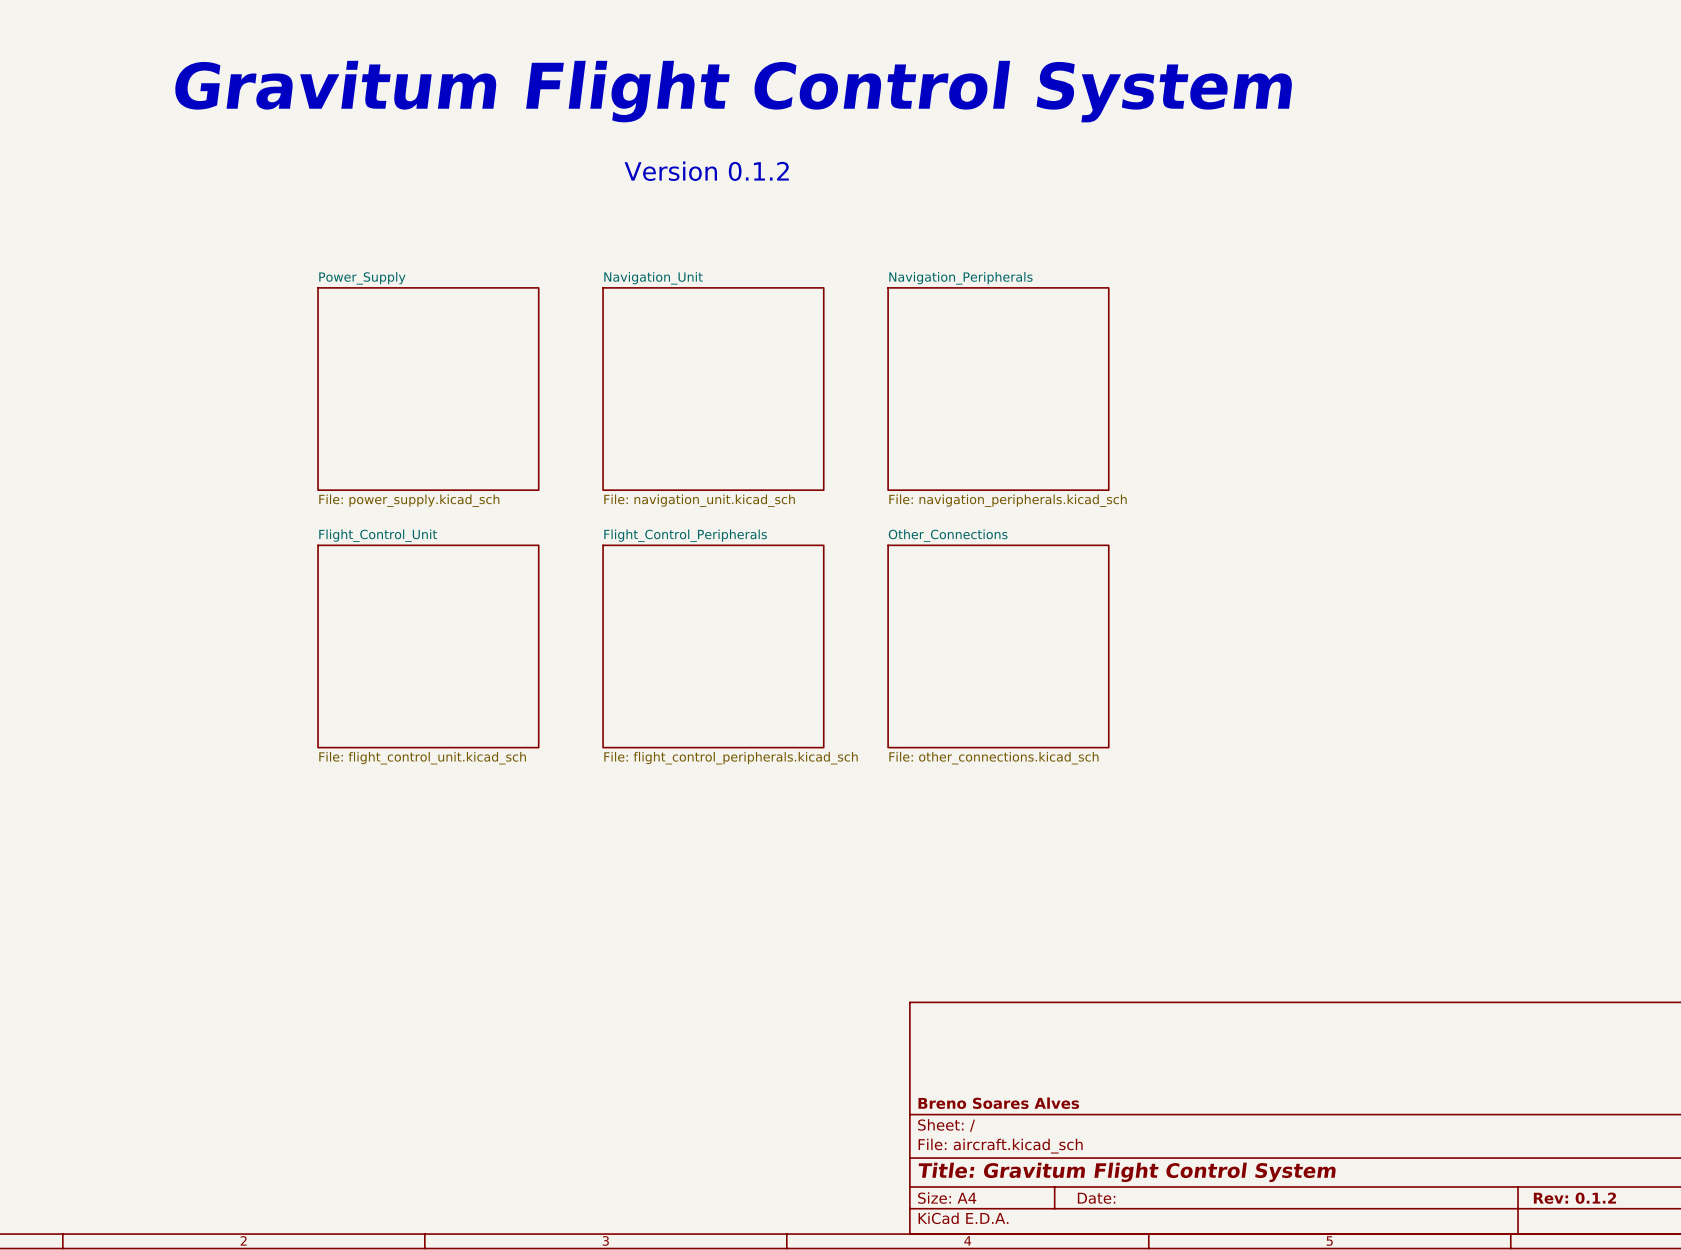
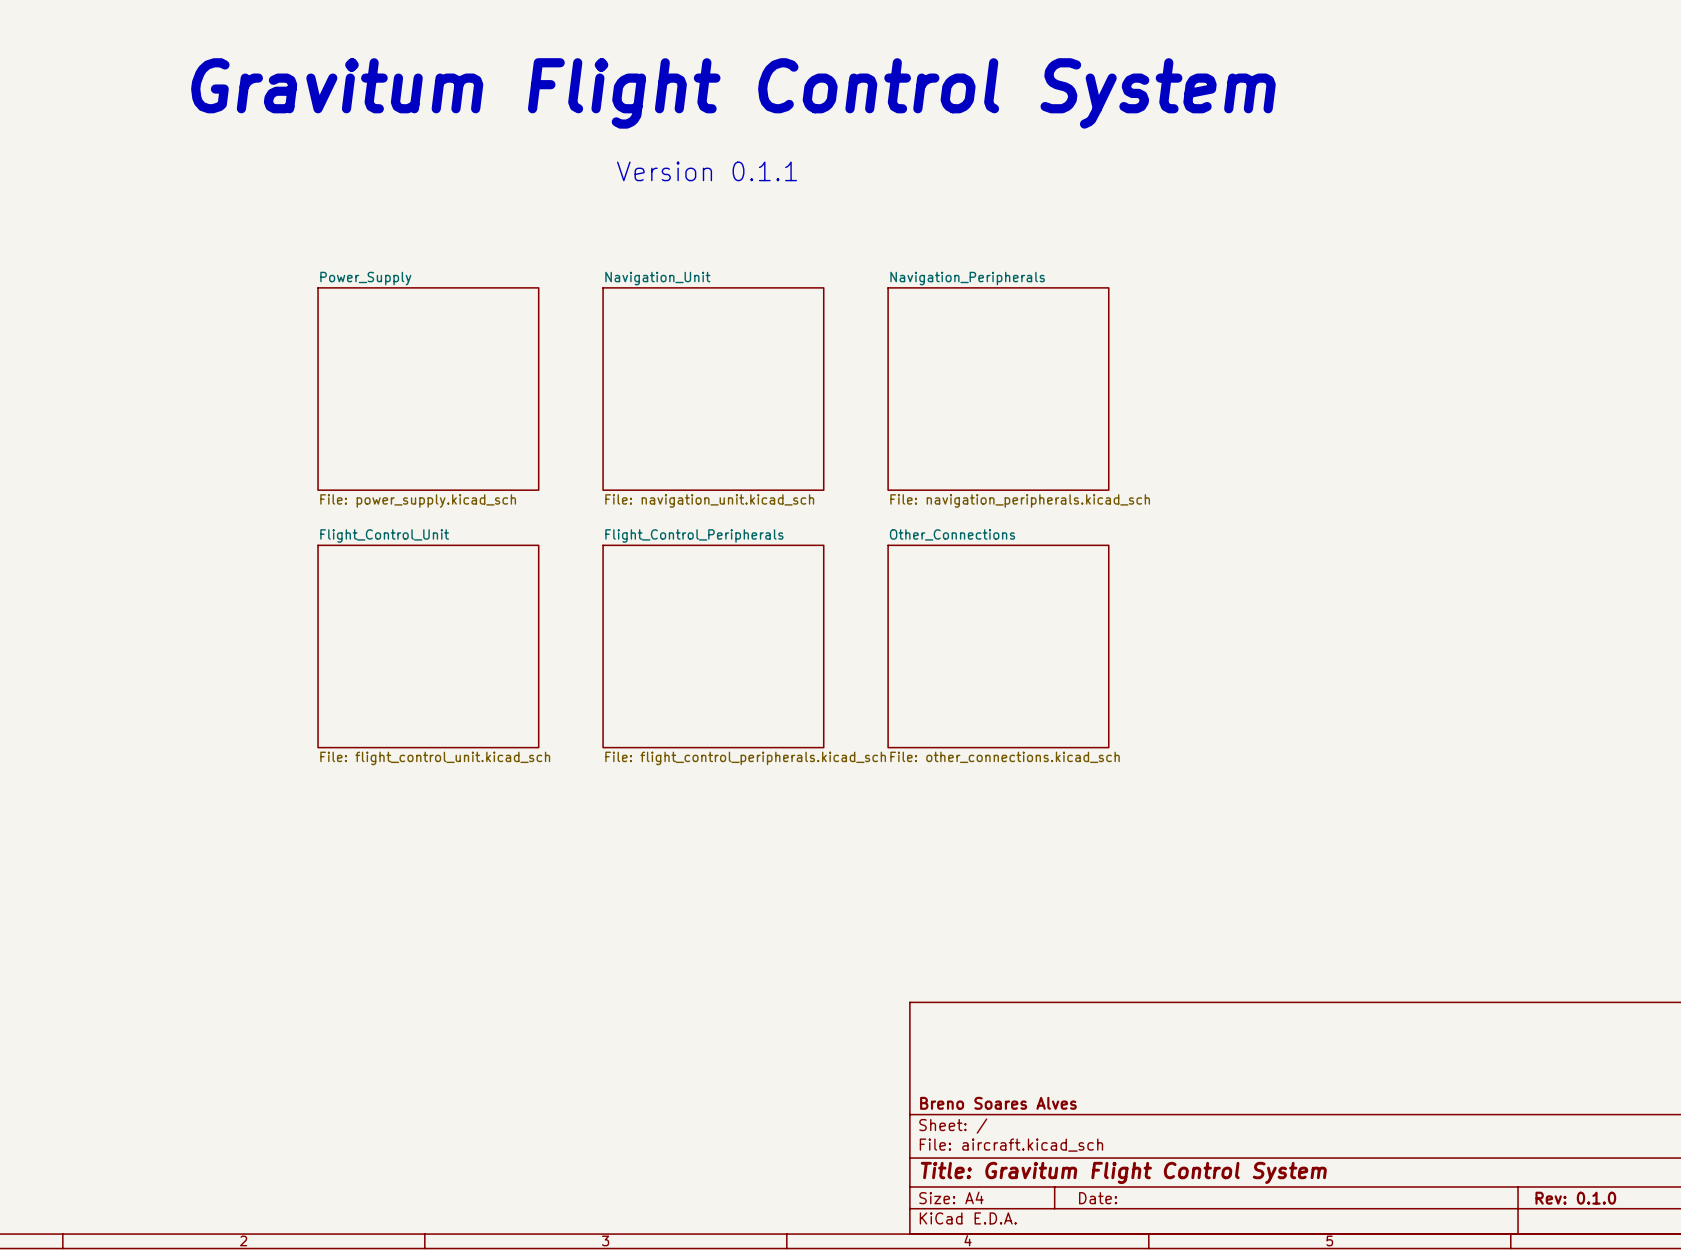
text: Version 0.1.2 (706, 171) -> Version 0.1.1 (707, 171)
title block: Rev: 0.1.2 (1574, 1198) -> Rev: 0.1.0 (1575, 1198)

